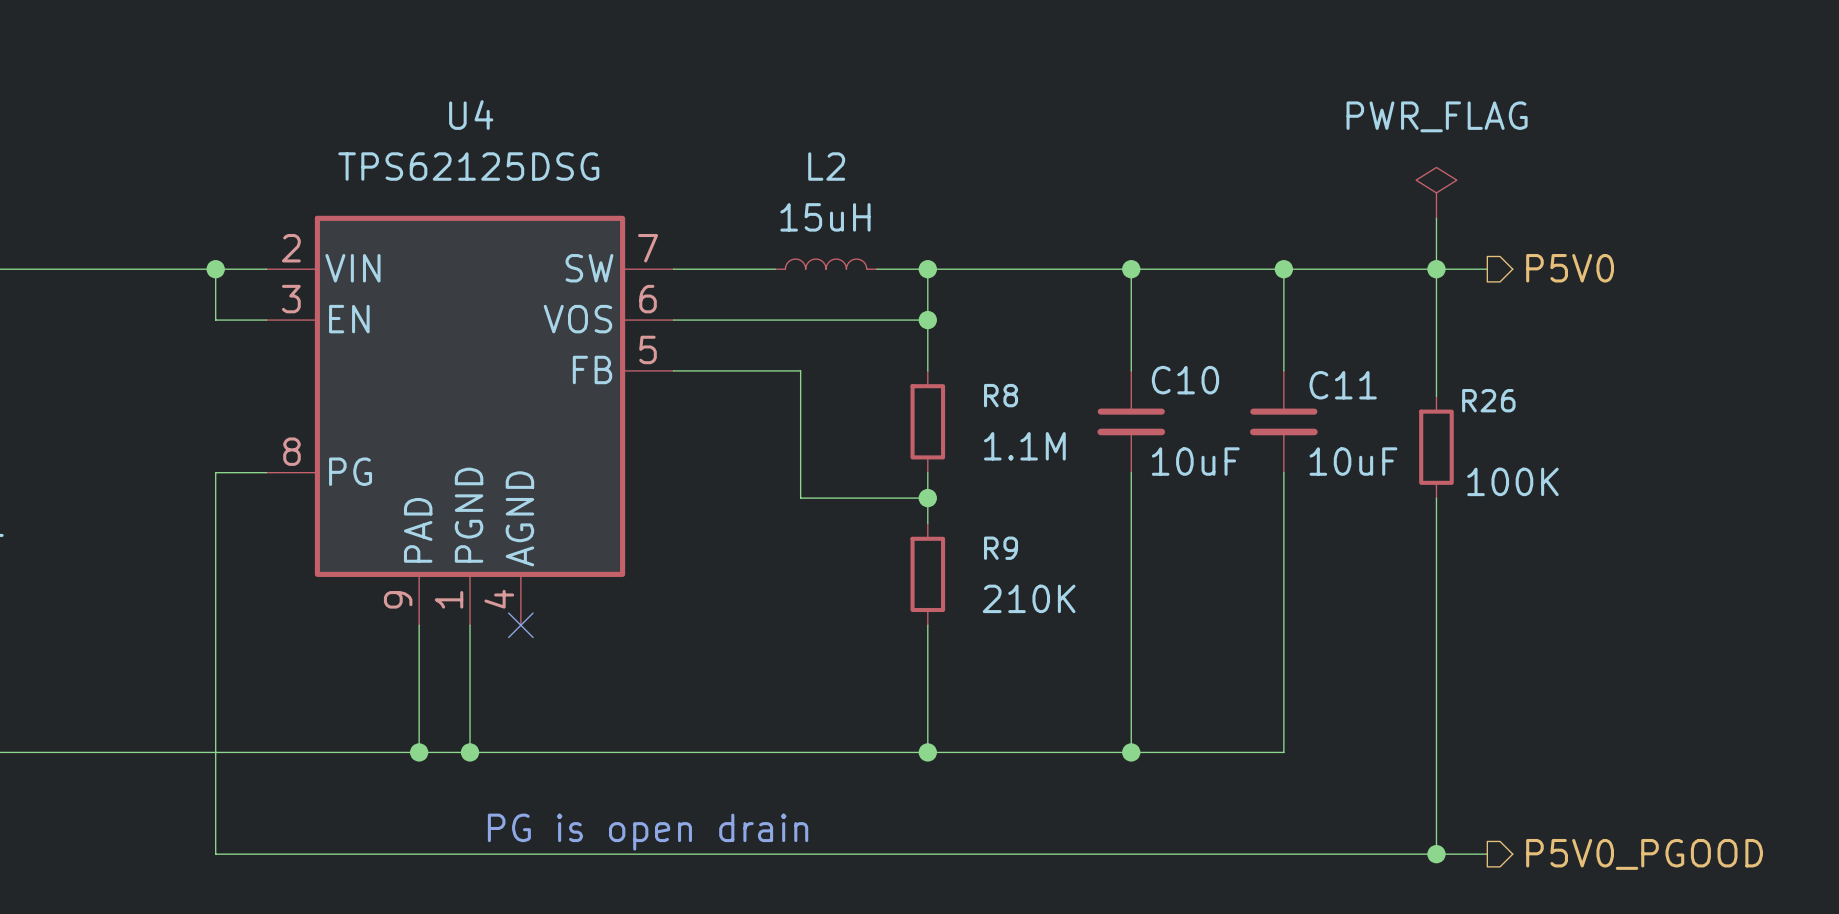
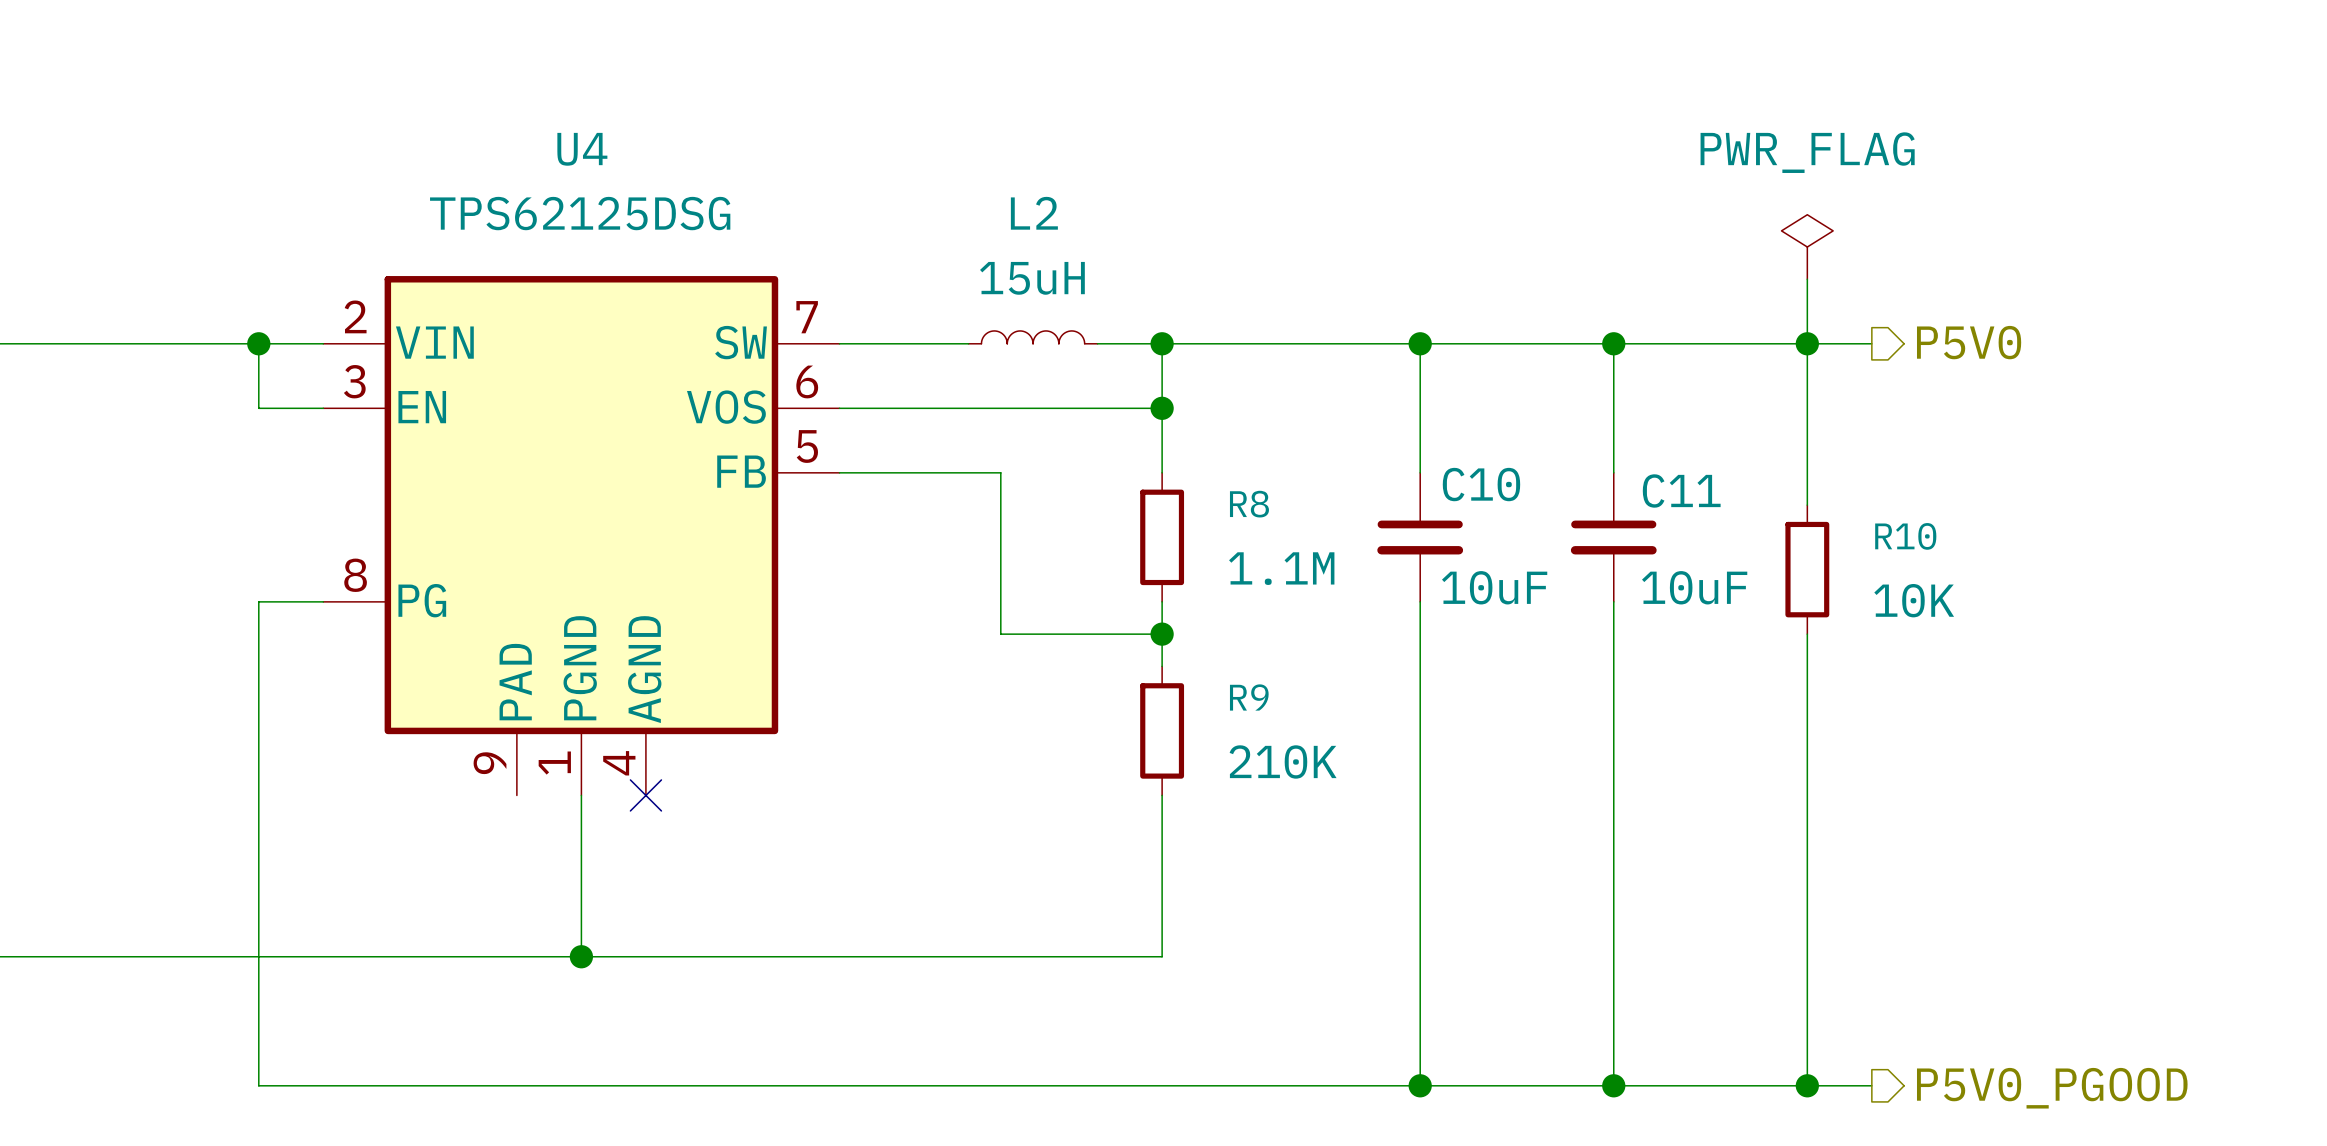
R26 name: R26 (1488, 400) -> R10 (1905, 536)
R26 value: 100K (1512, 481) -> 10K (1914, 600)
wire: (419, 625) (419, 752) -> none
junction: (419, 752) -> none
wire: (927, 752) (1283, 752) -> (1613, 1085) (1613, 956)
junction: (927, 752) -> none
wire: none -> (1420, 956) (1420, 1085)
junction: (1131, 752) -> none
text: PG is open drain (648, 832) -> none
junction: none -> (1420, 1085)
junction: none -> (1613, 1085)

